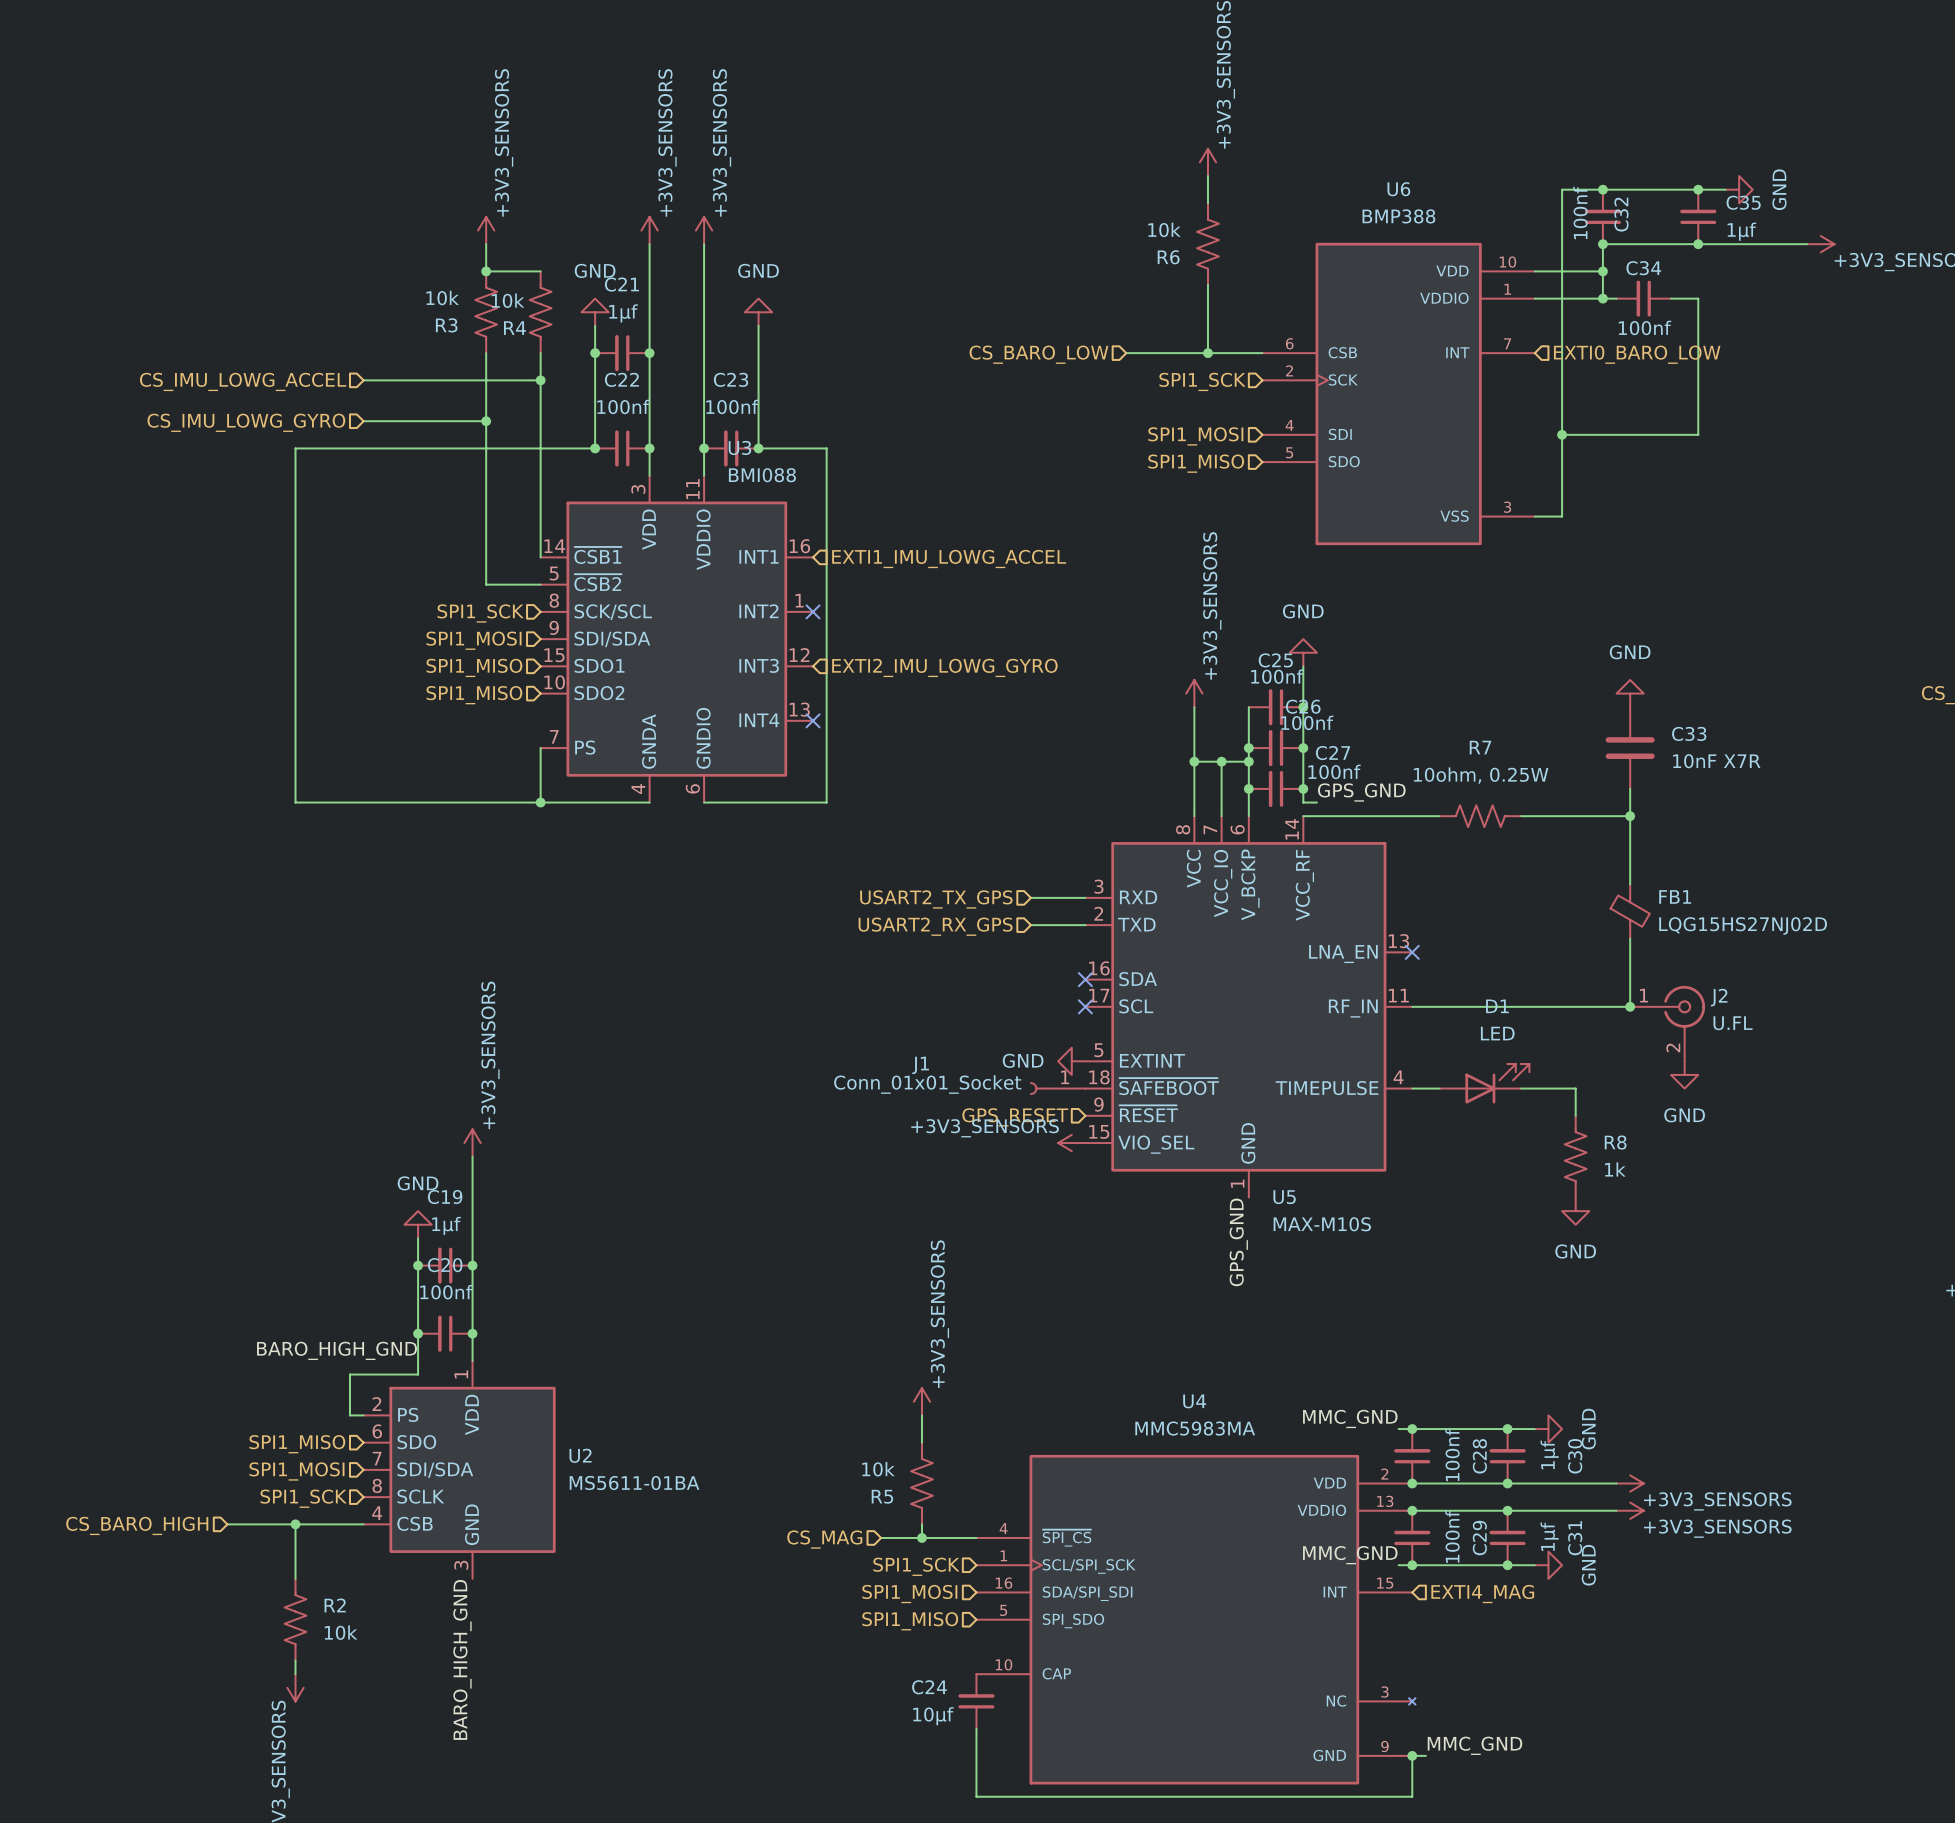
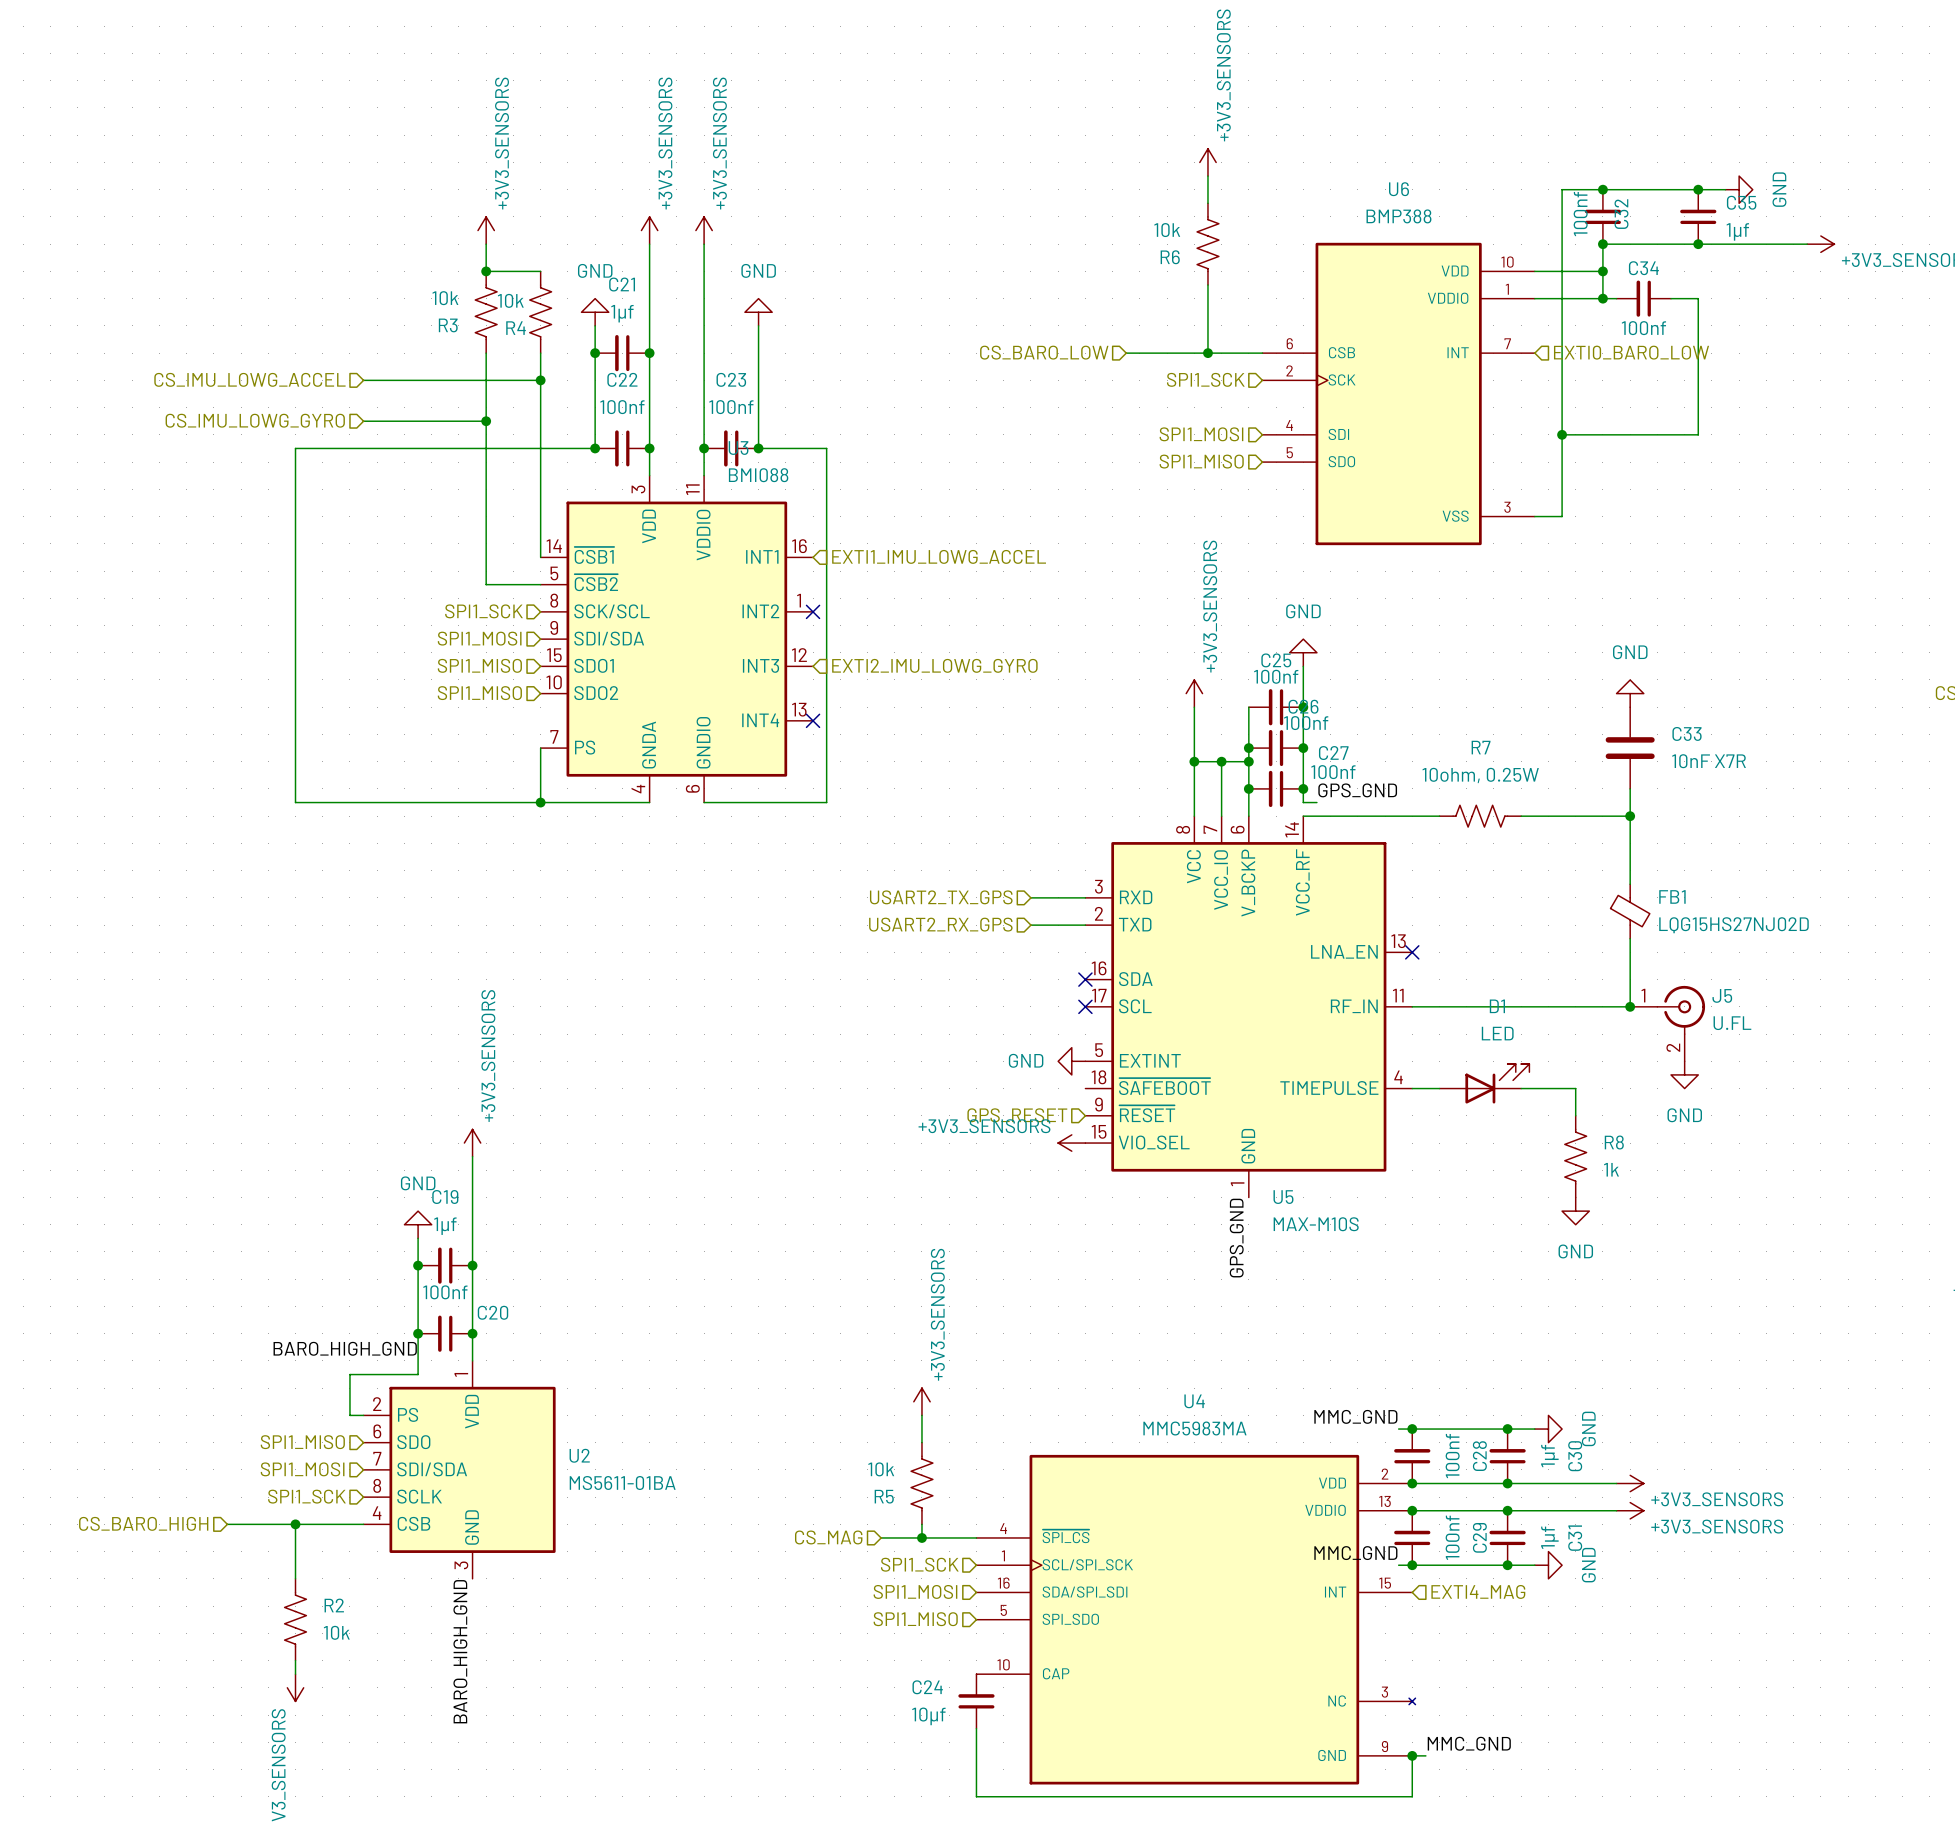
J2 name: J2 (1719, 997) -> J5 (1722, 995)
J1: Conn_01x01_Socket (1057, 1088) -> none
C20 name position: C20 (445, 1265) -> C20 (492, 1312)

